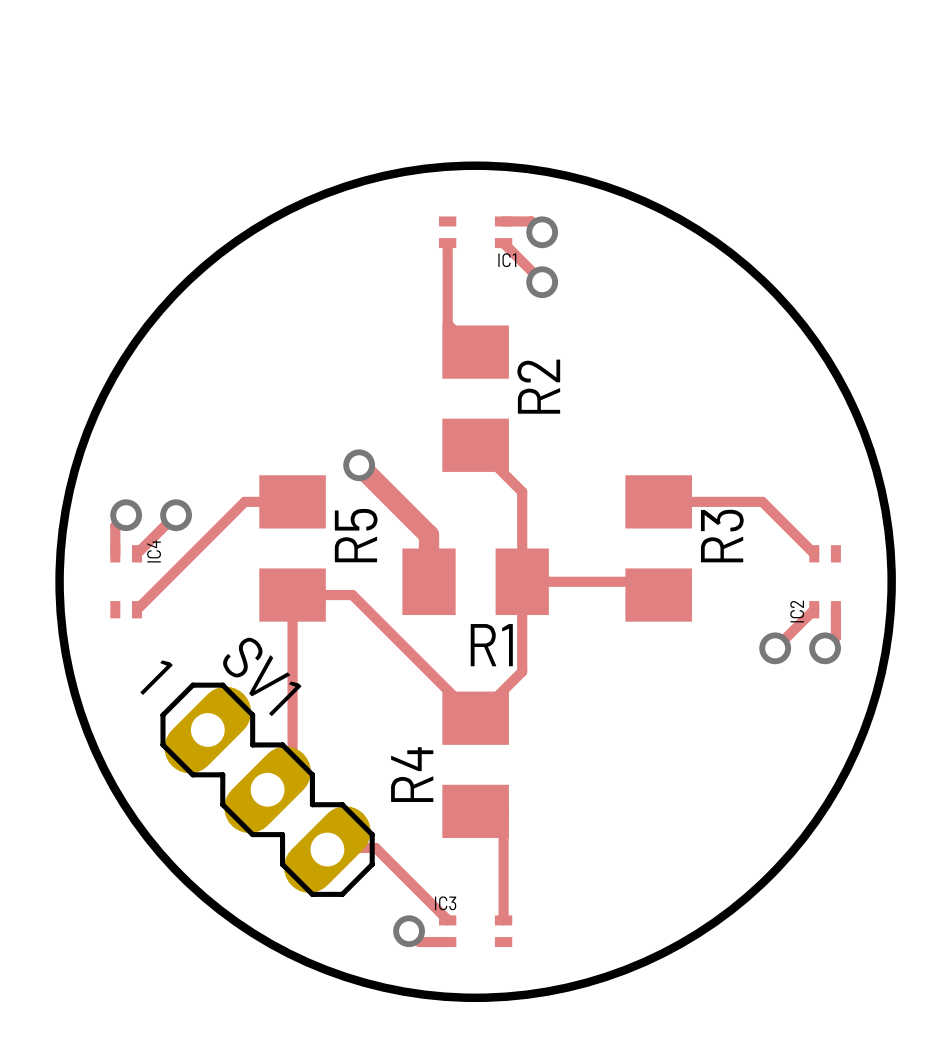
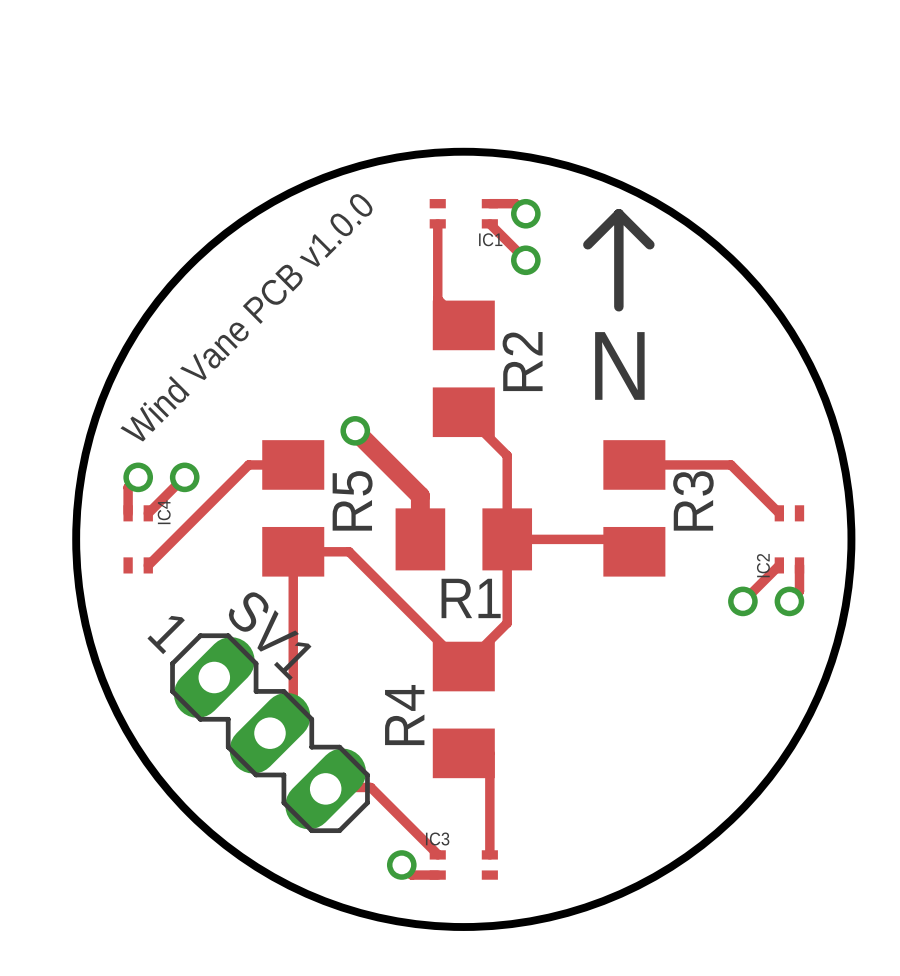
line: none -> (618, 213) (618, 306)
line: none -> (618, 213) (587, 244)
line: none -> (618, 213) (649, 244)
text: none -> Wind Vane PCB v1.0.0 (246, 317)
text: none -> N (619, 365)

